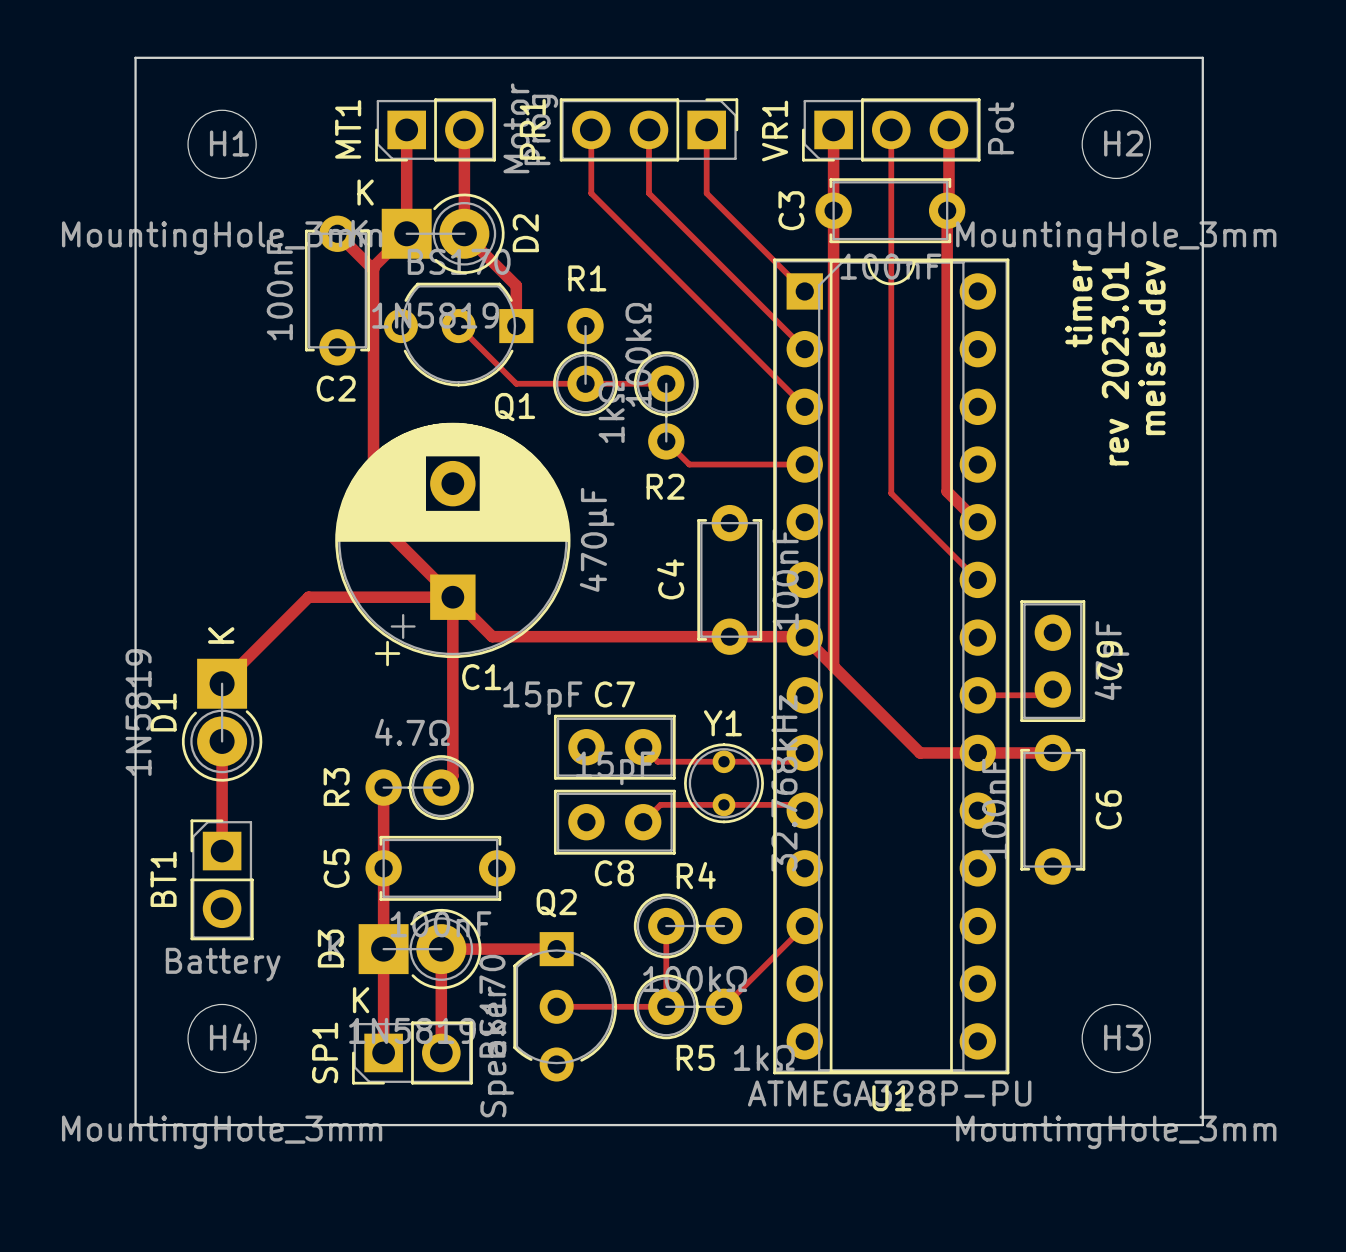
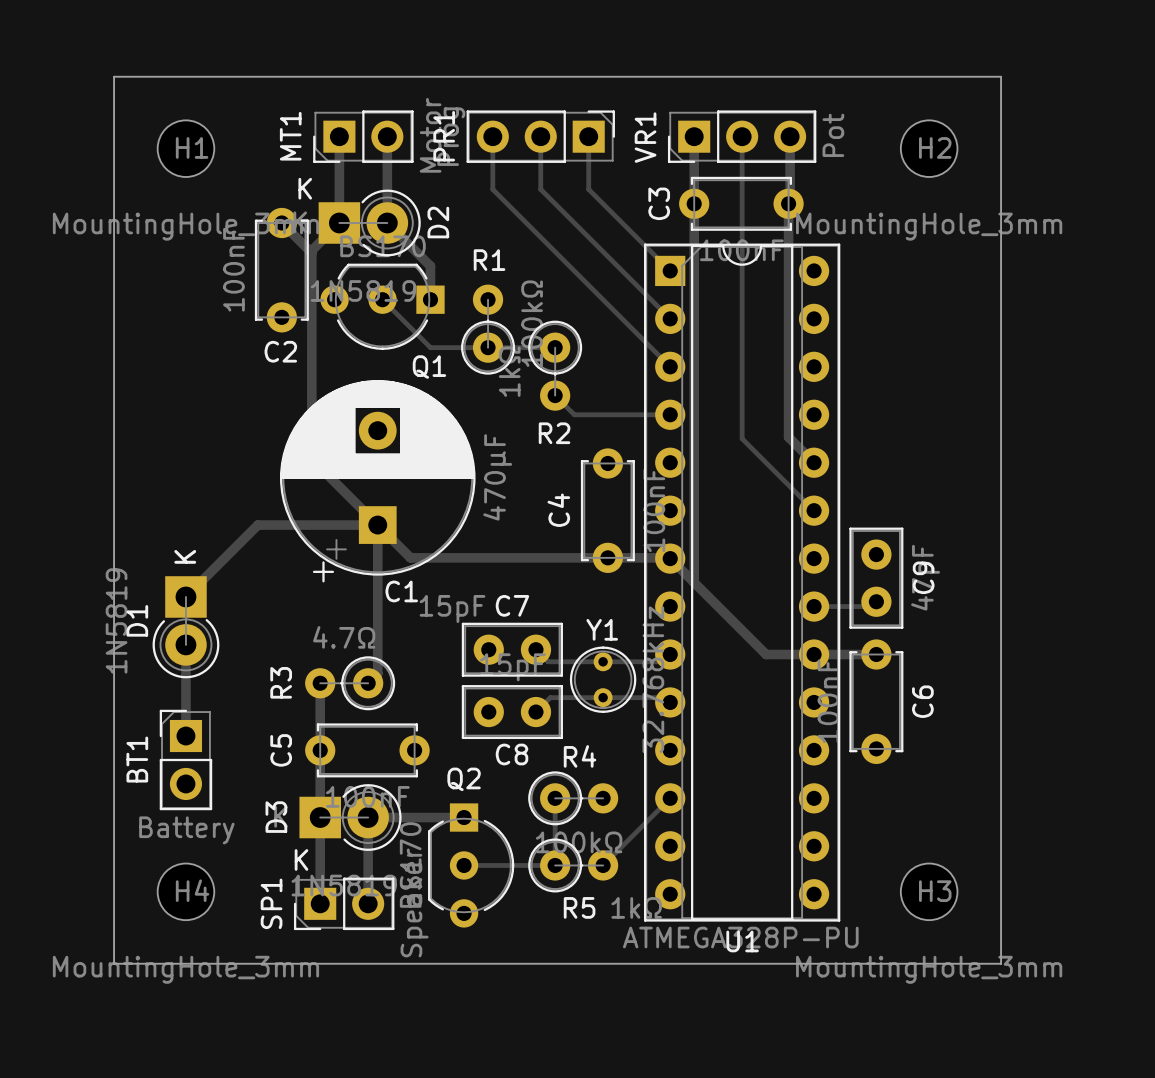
text: timer (1078, 303) -> none
text: meisel.dev (1151, 347) -> none
text: rev 2023.01 (1115, 363) -> none

